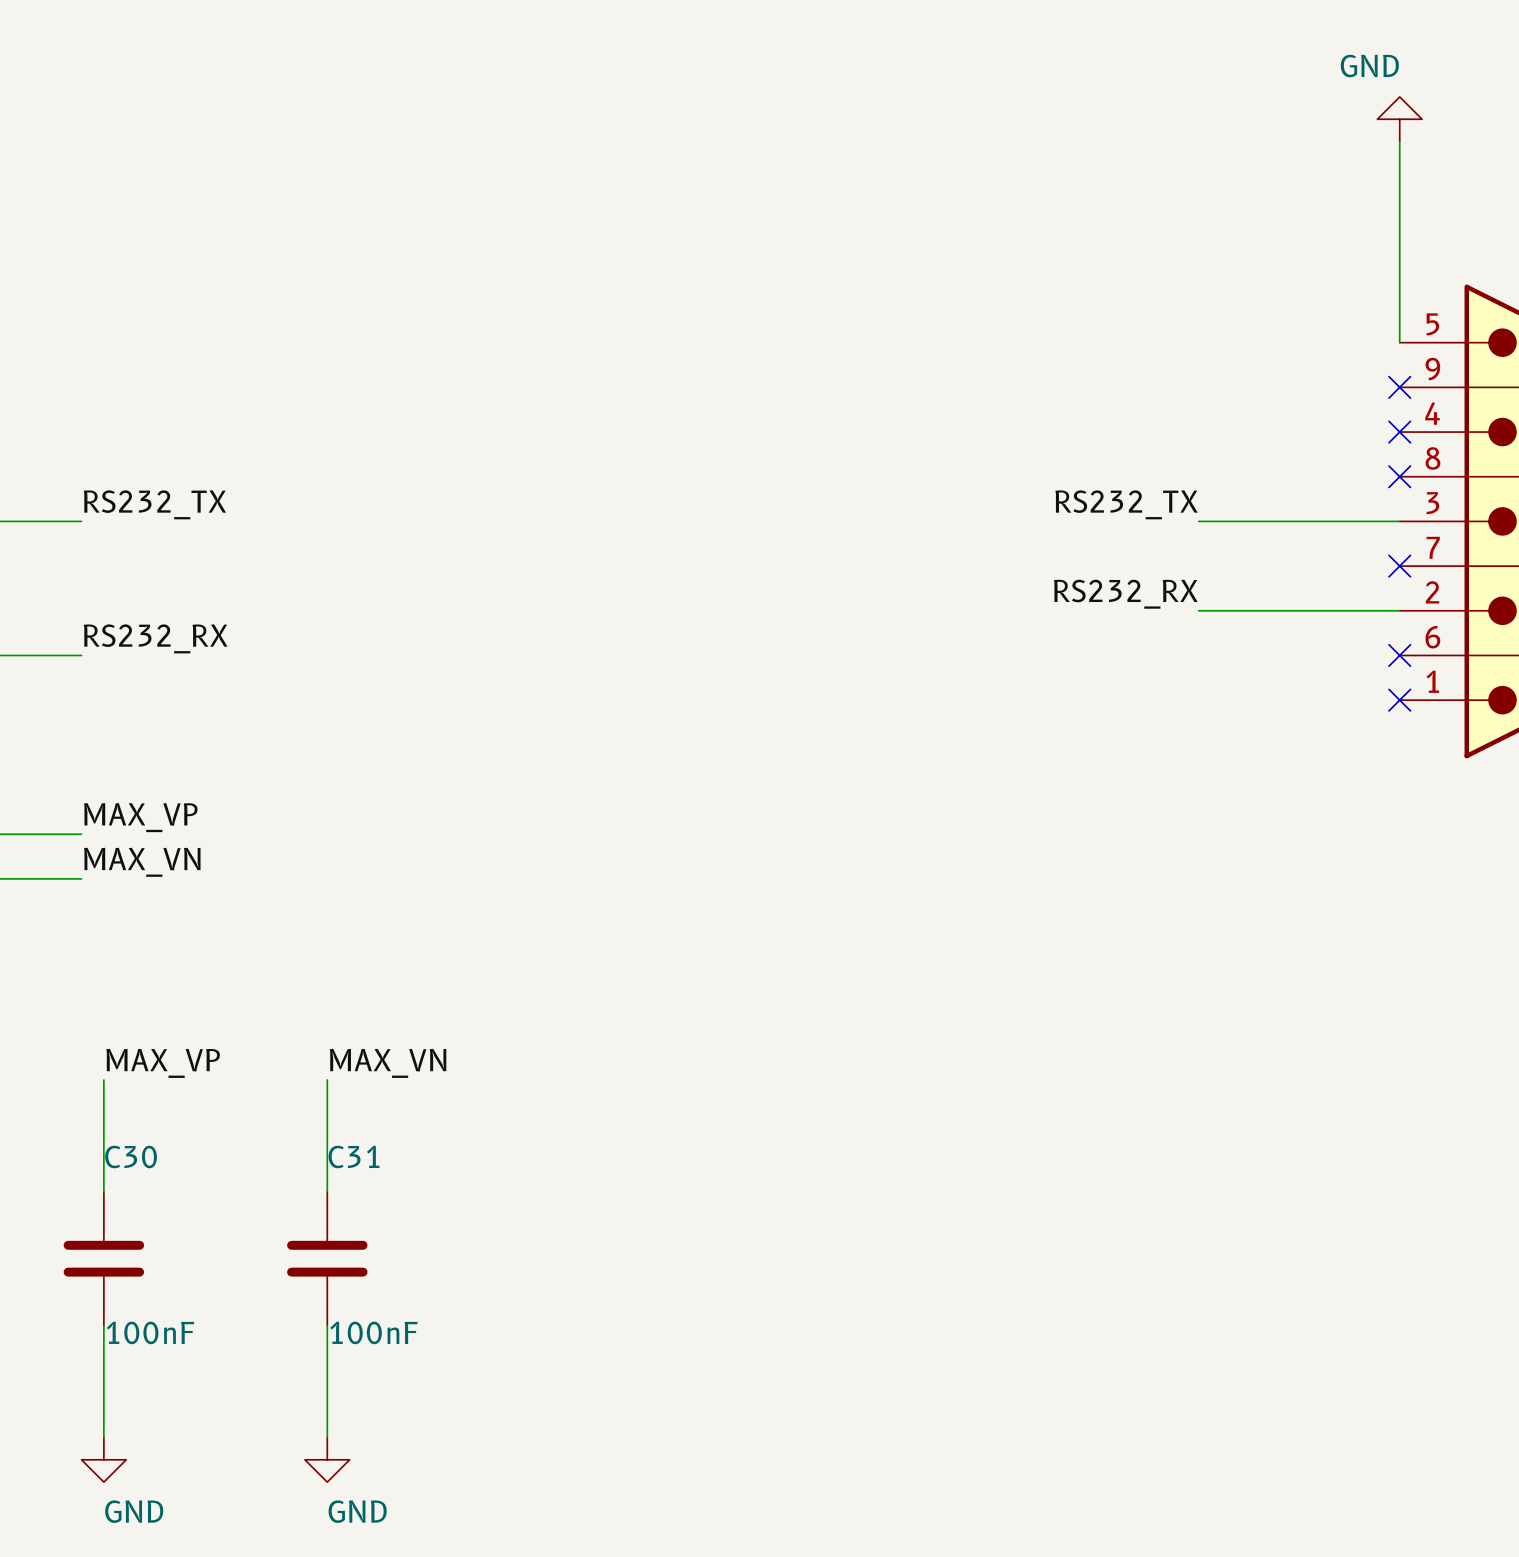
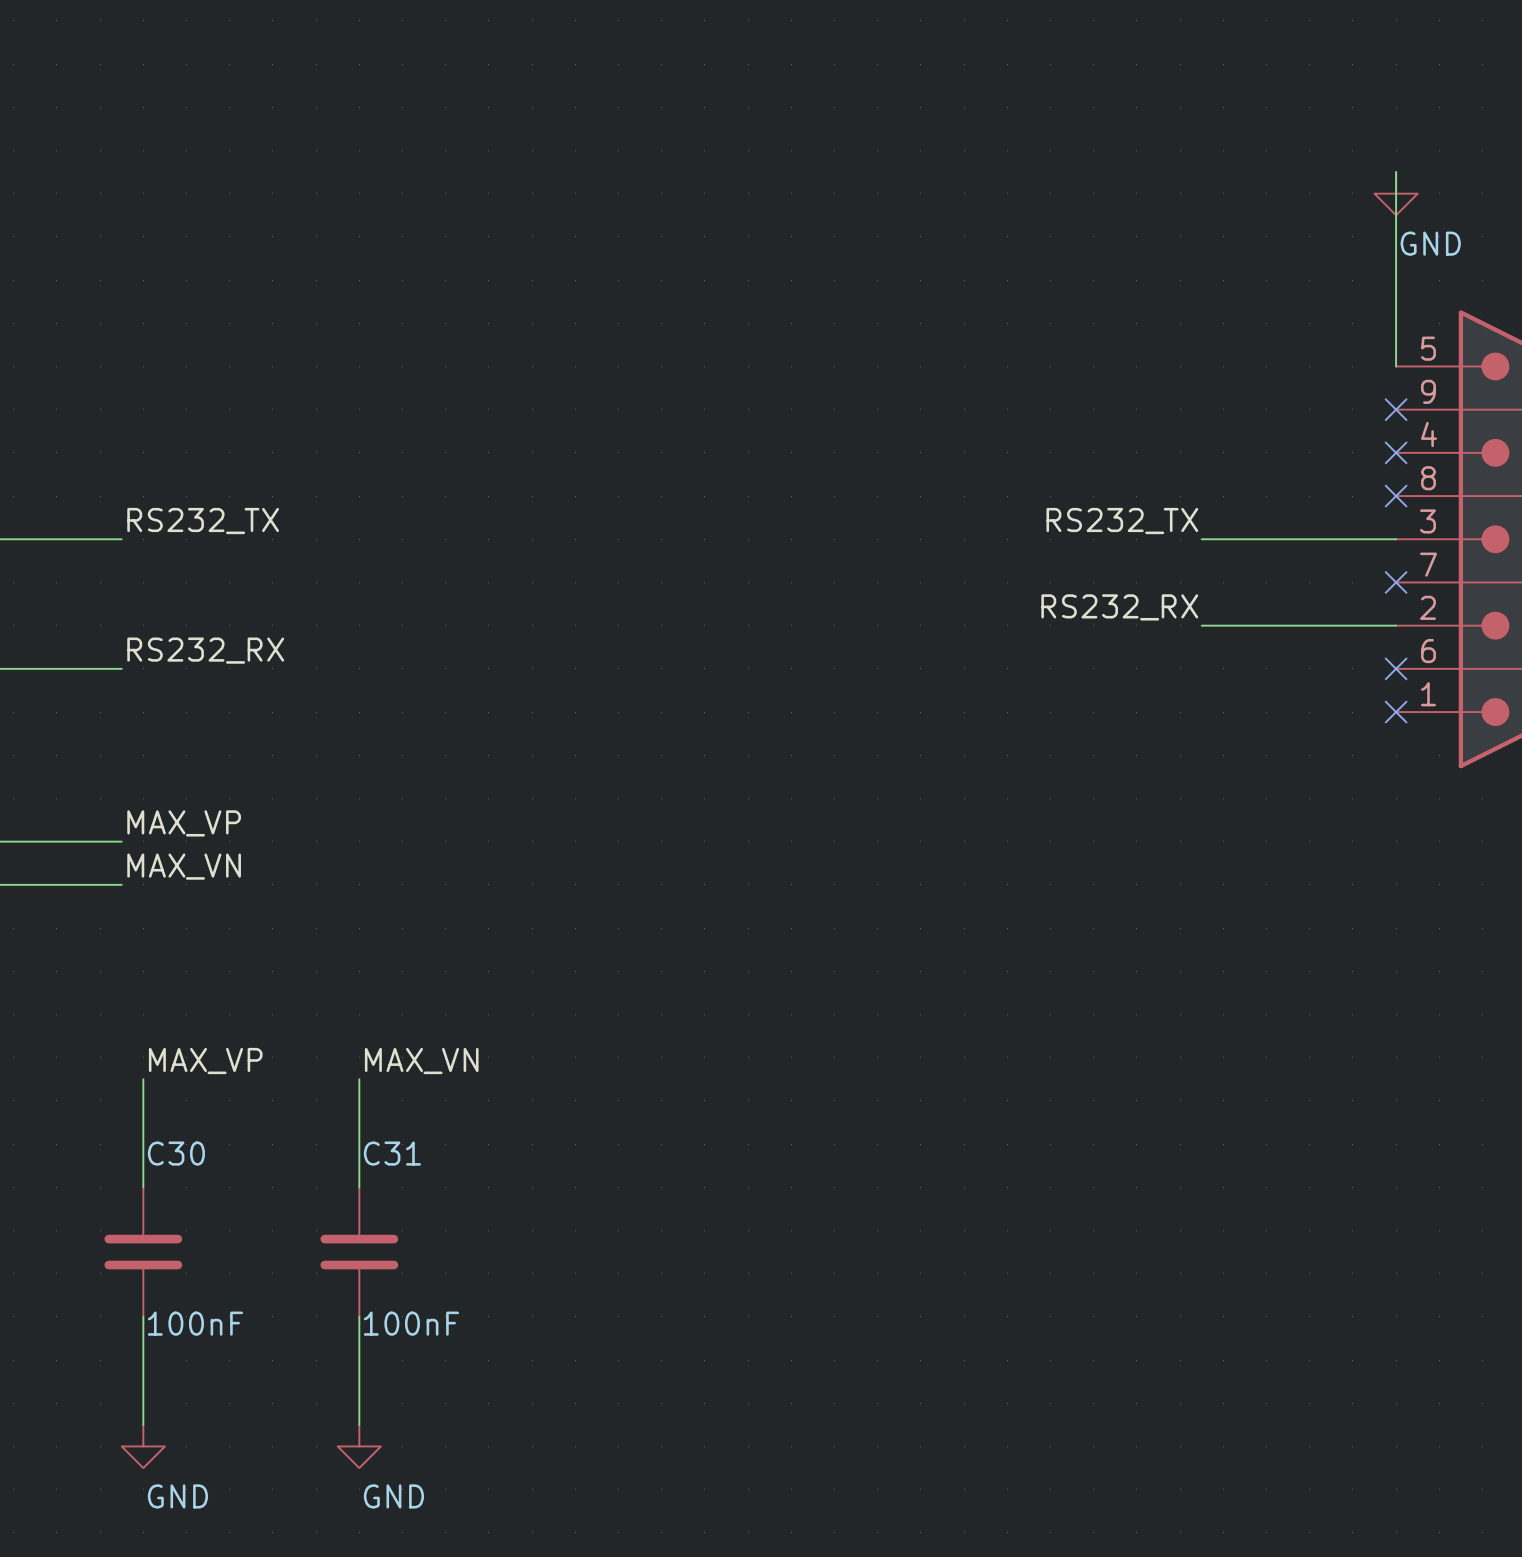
power symbol rotation: 0° (1399, 119) -> 180° (1396, 193)
power symbol position: GND (1399, 119) -> GND (1396, 193)

